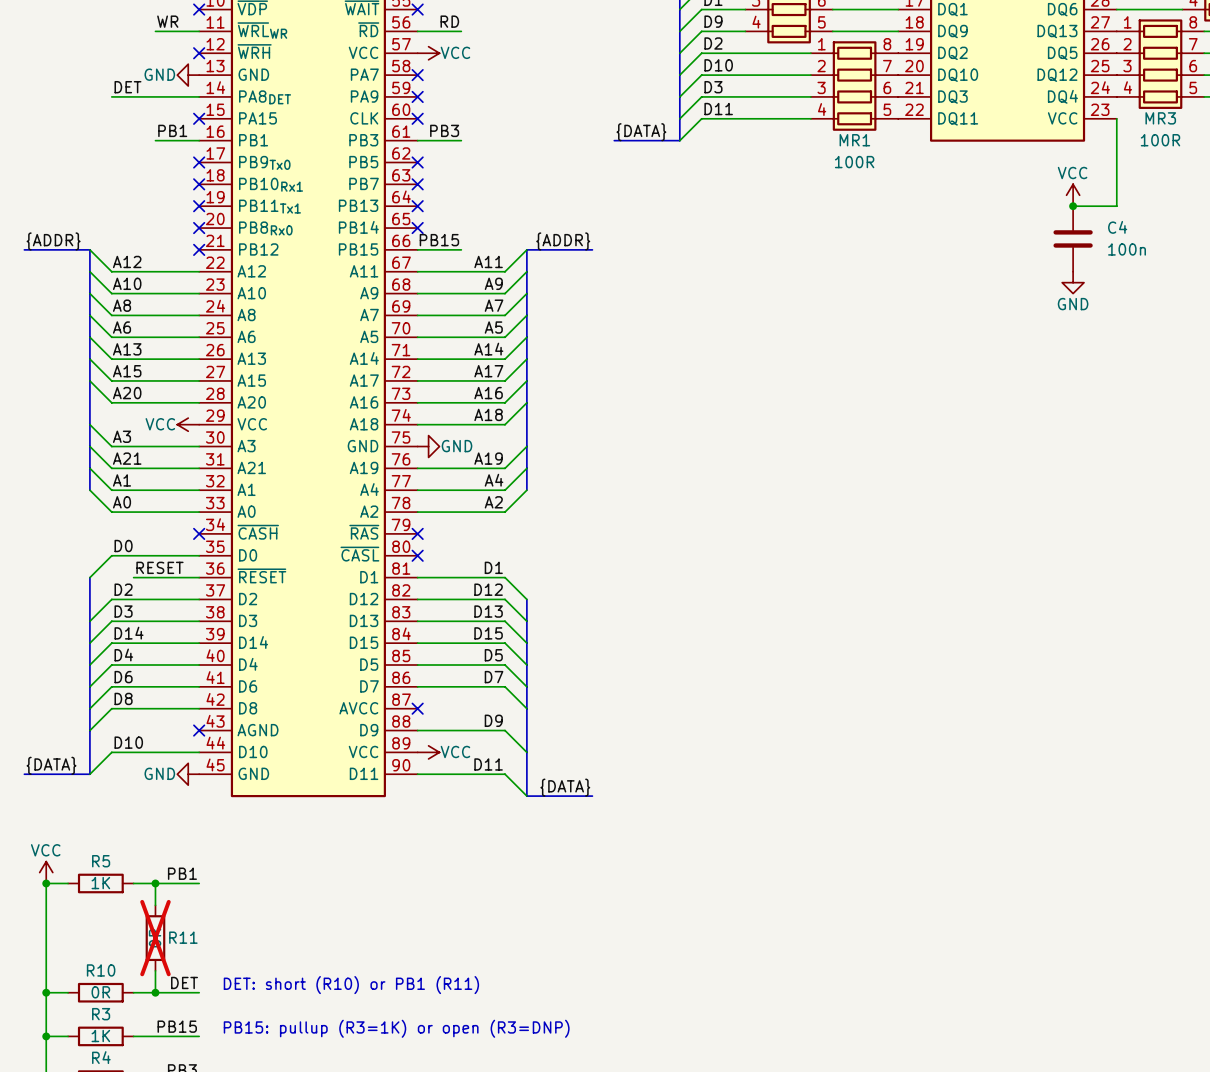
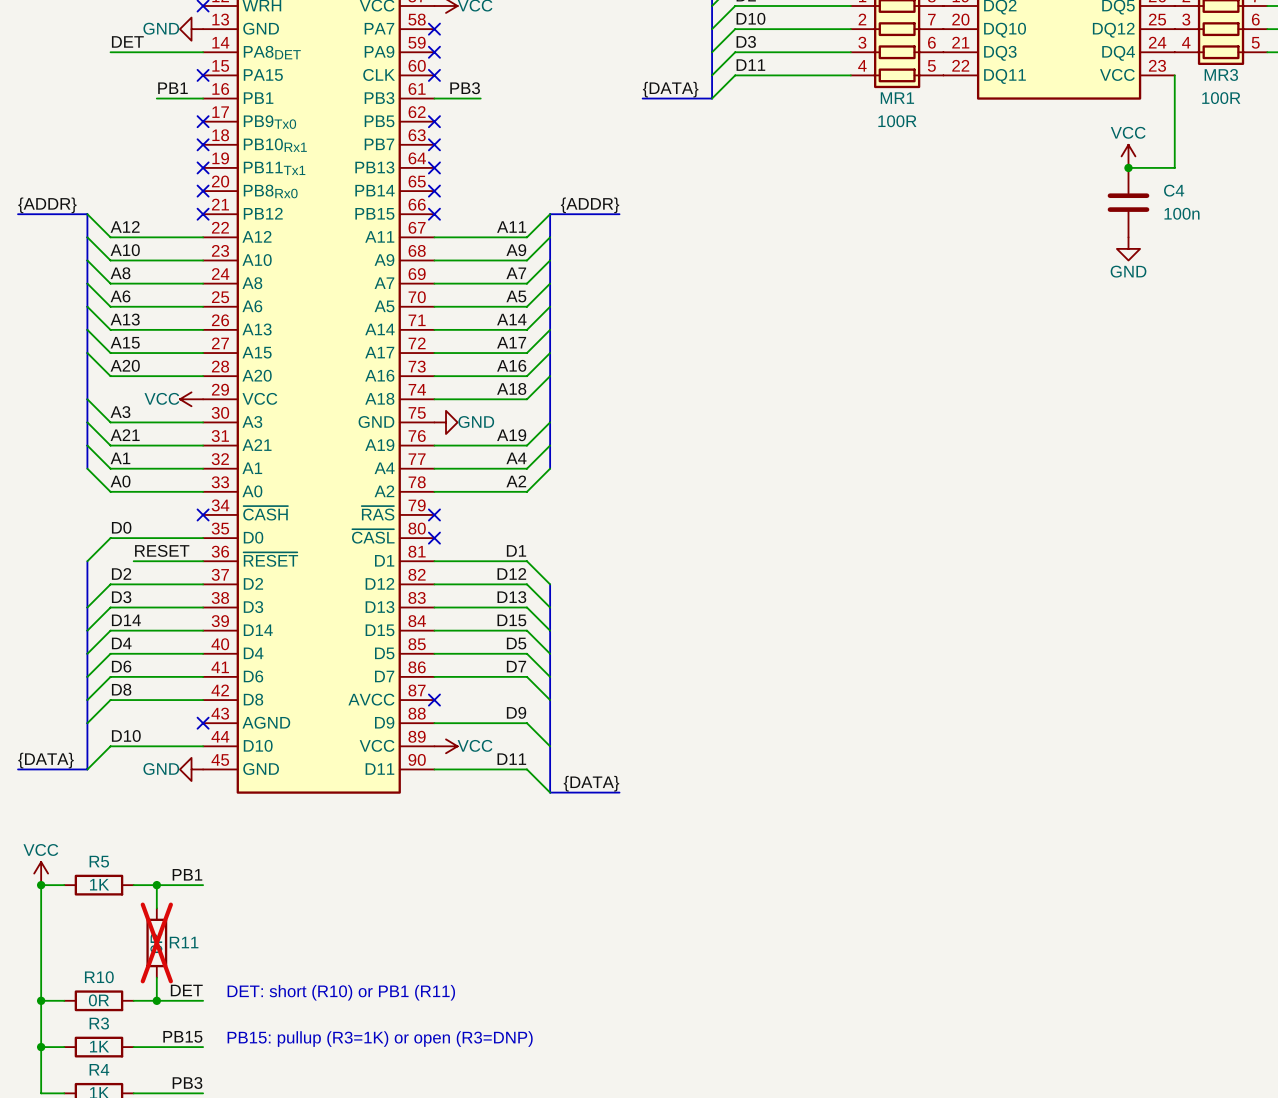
label: PB15 (439, 240) -> none
wire: (417, 249) (461, 249) -> none
no-connect mark: none -> (434, 214)

